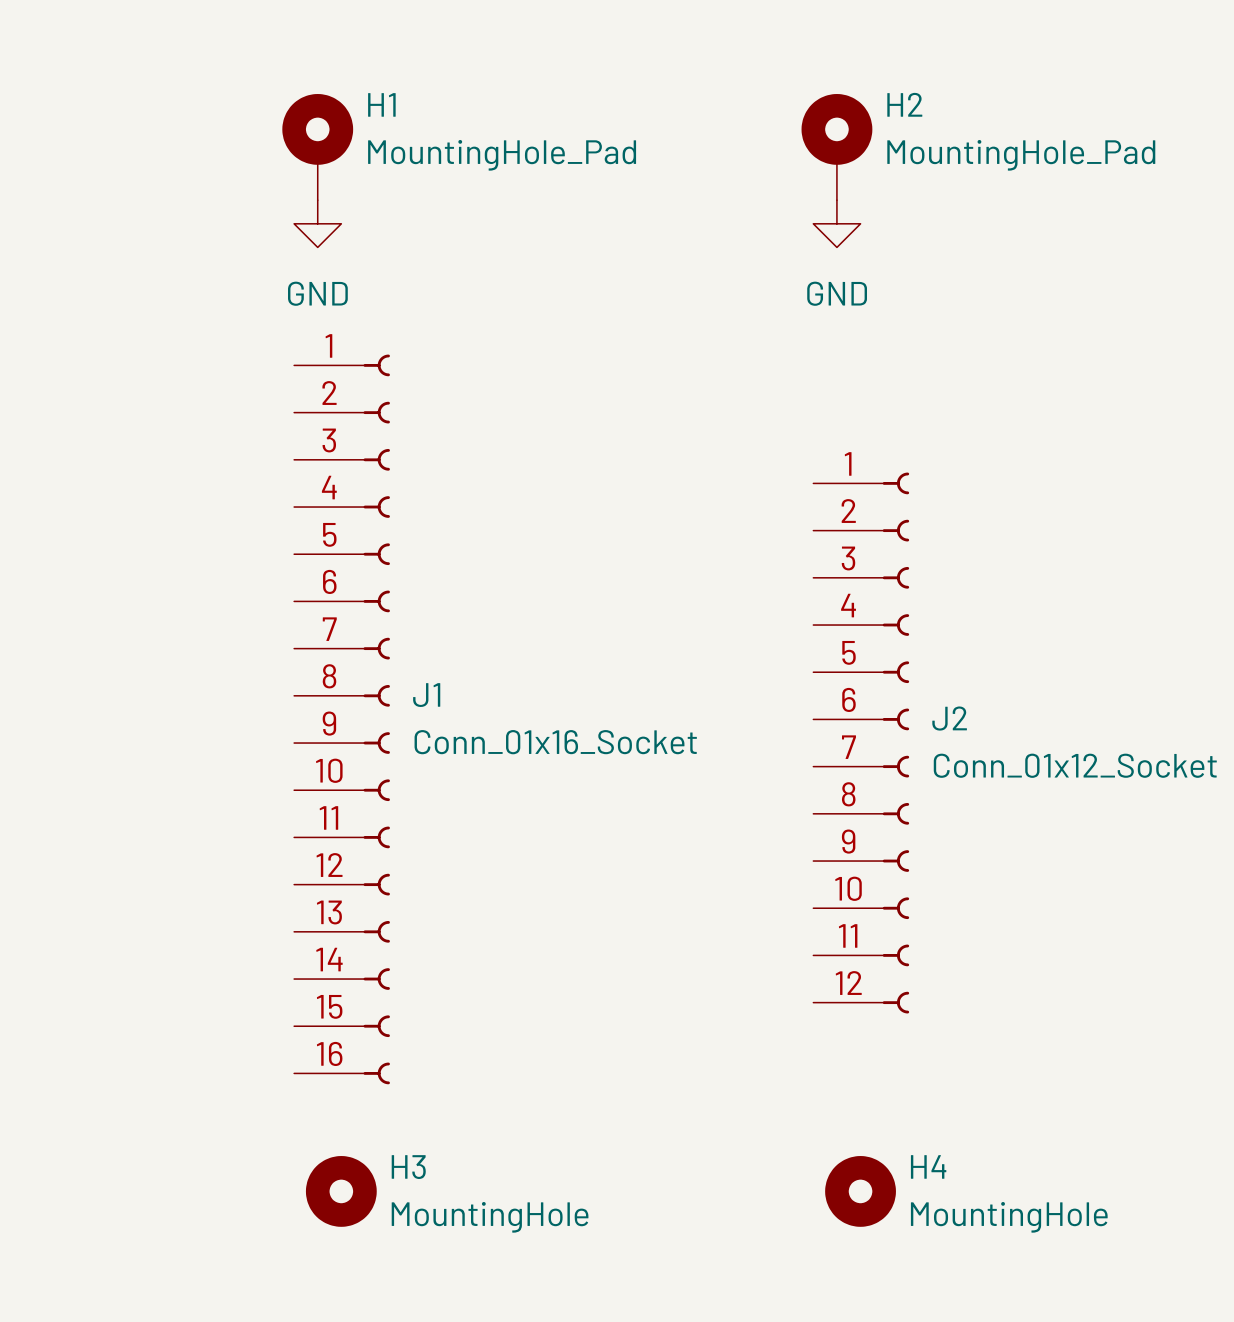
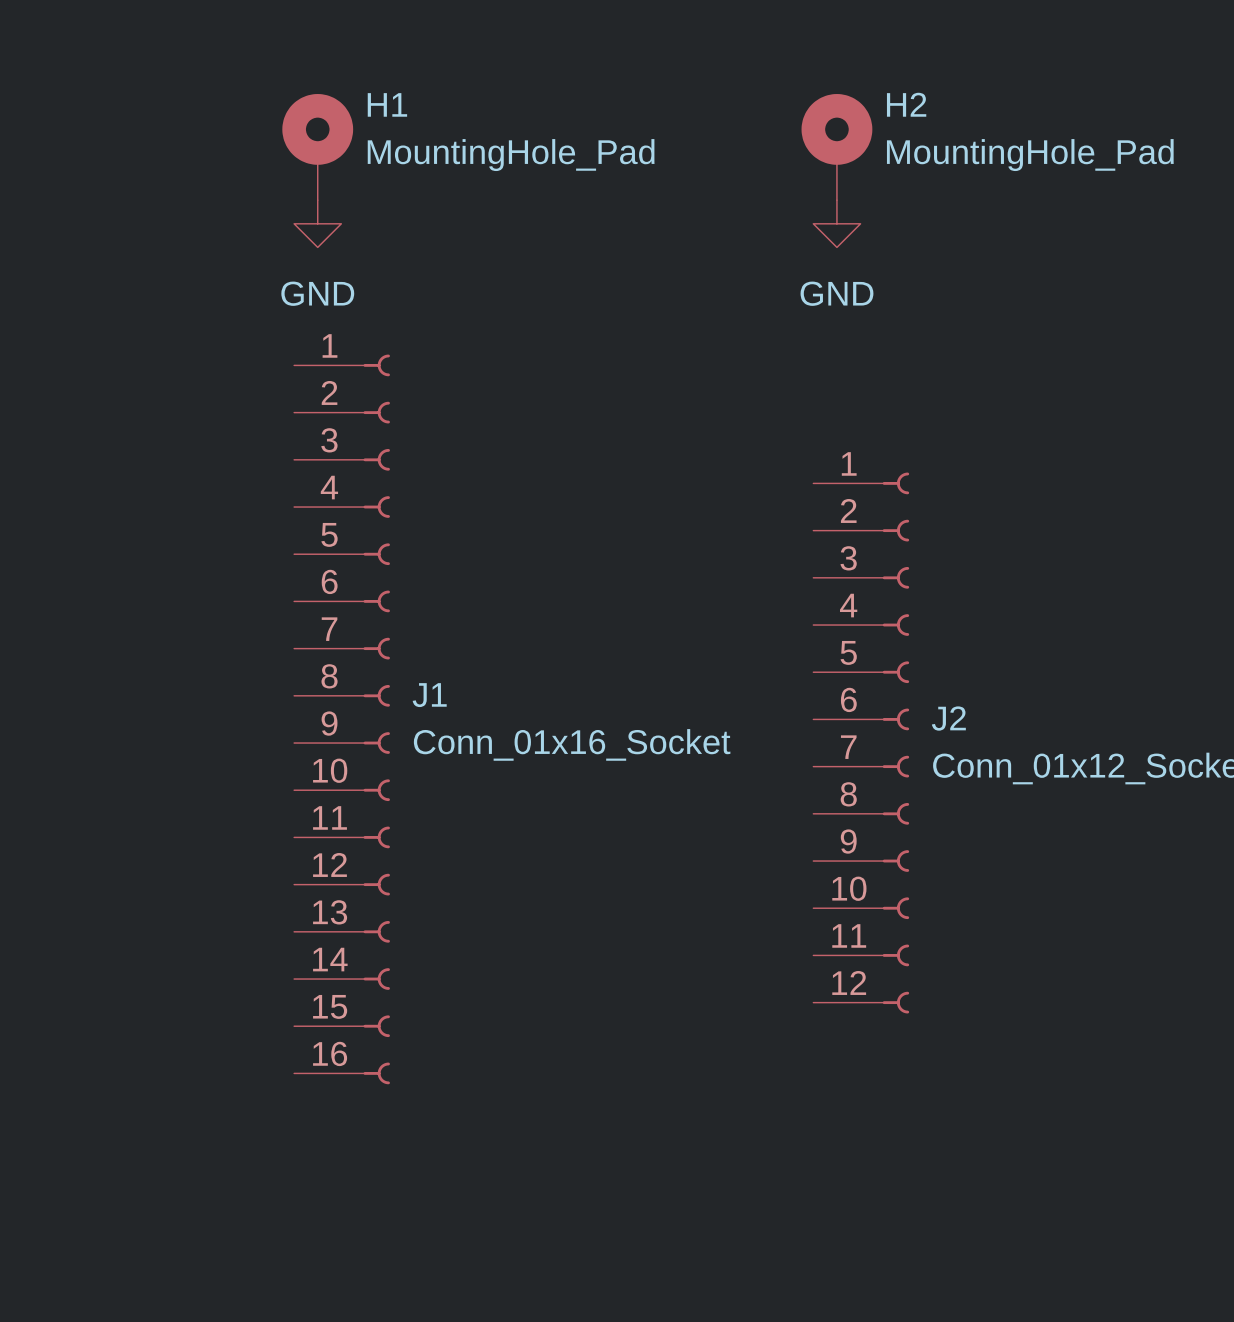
H3: MountingHole (341, 1191) -> none
H4: MountingHole (860, 1191) -> none

